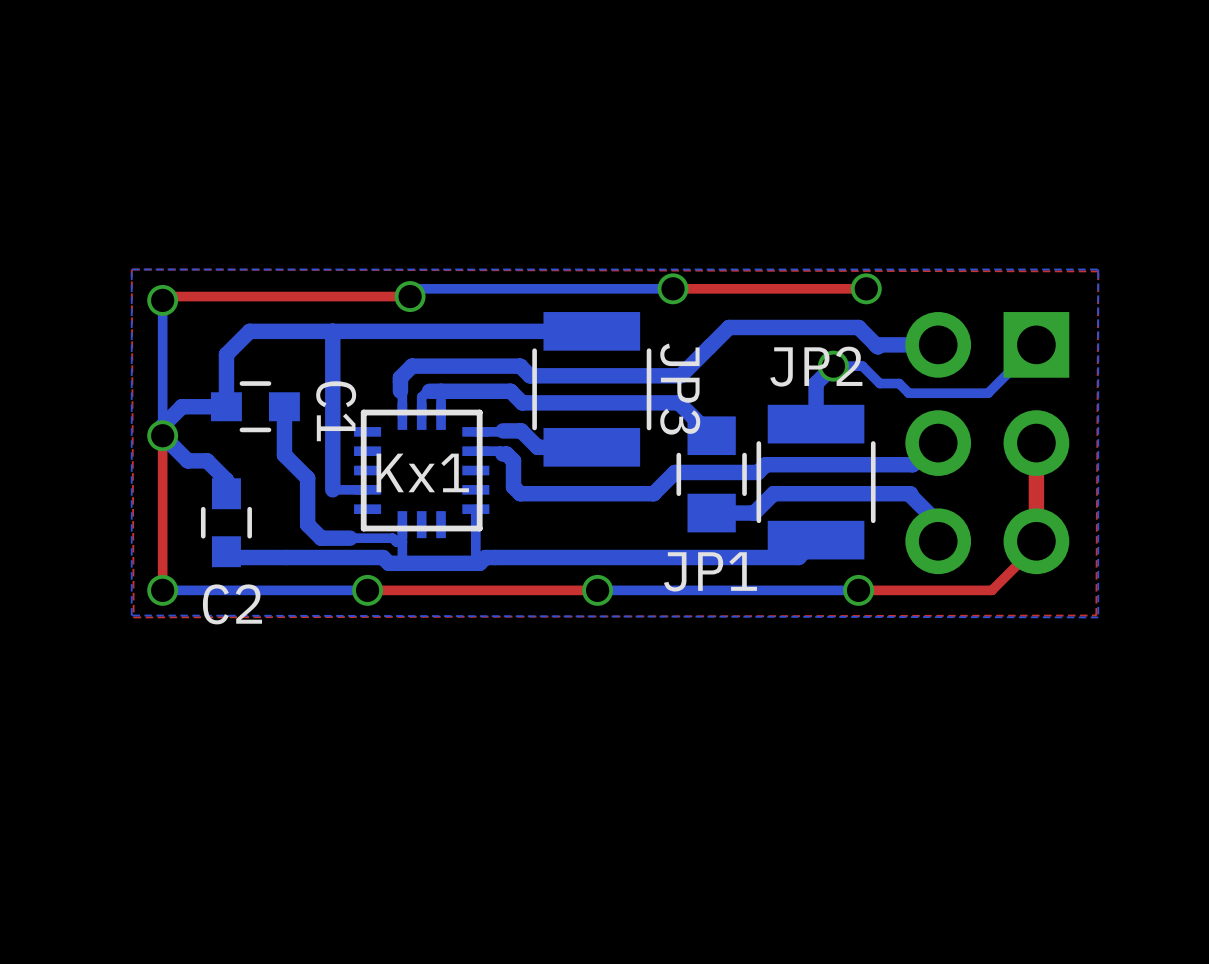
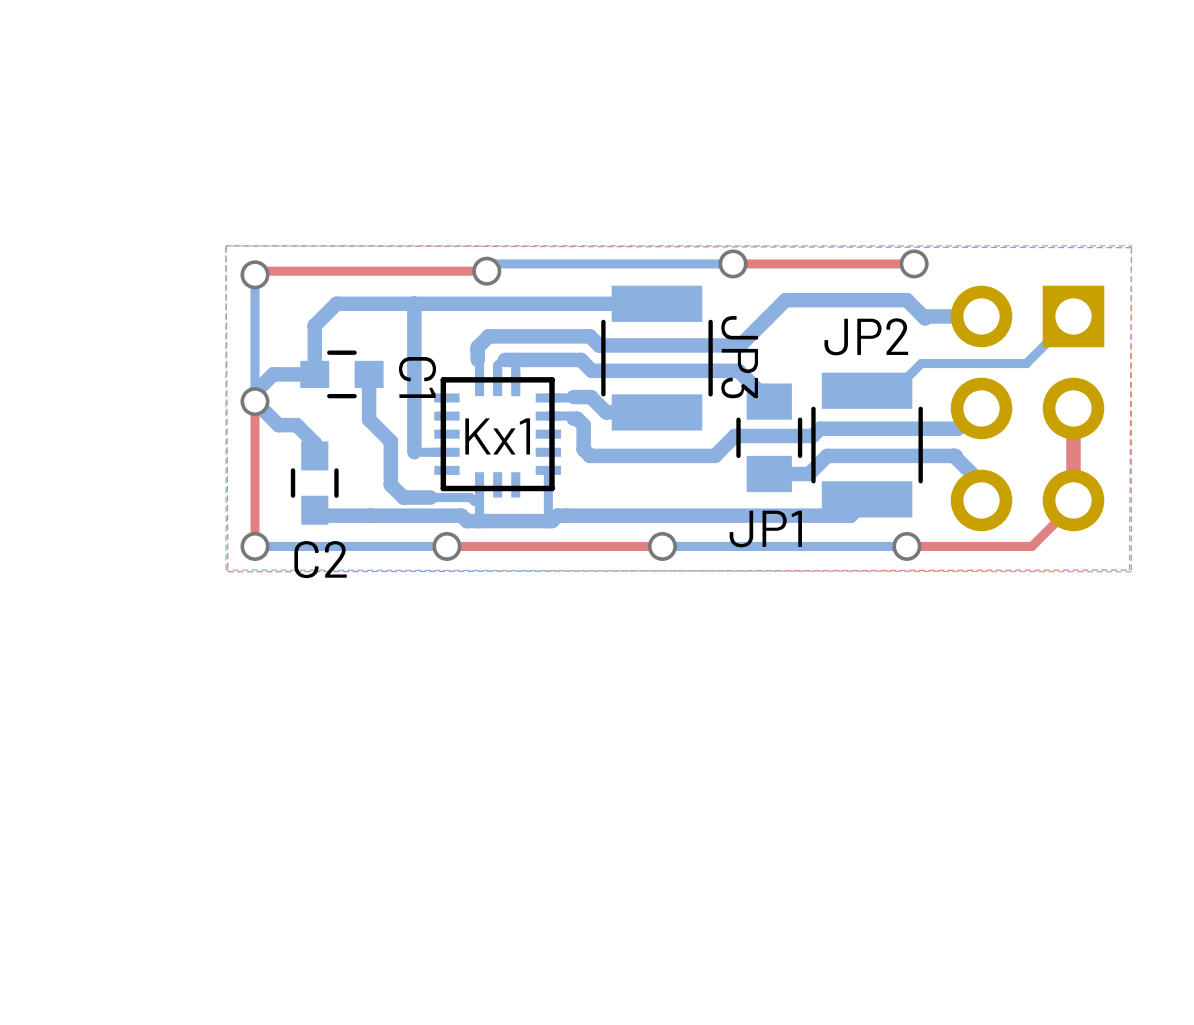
via: (833, 366) -> none
bottom track: (988, 393) (908, 393) (899, 383) (879, 383) (862, 366) (833, 366) (816, 383) (816, 424) -> (1028, 361) (1026, 363) (921, 363) (894, 390) (867, 390)

